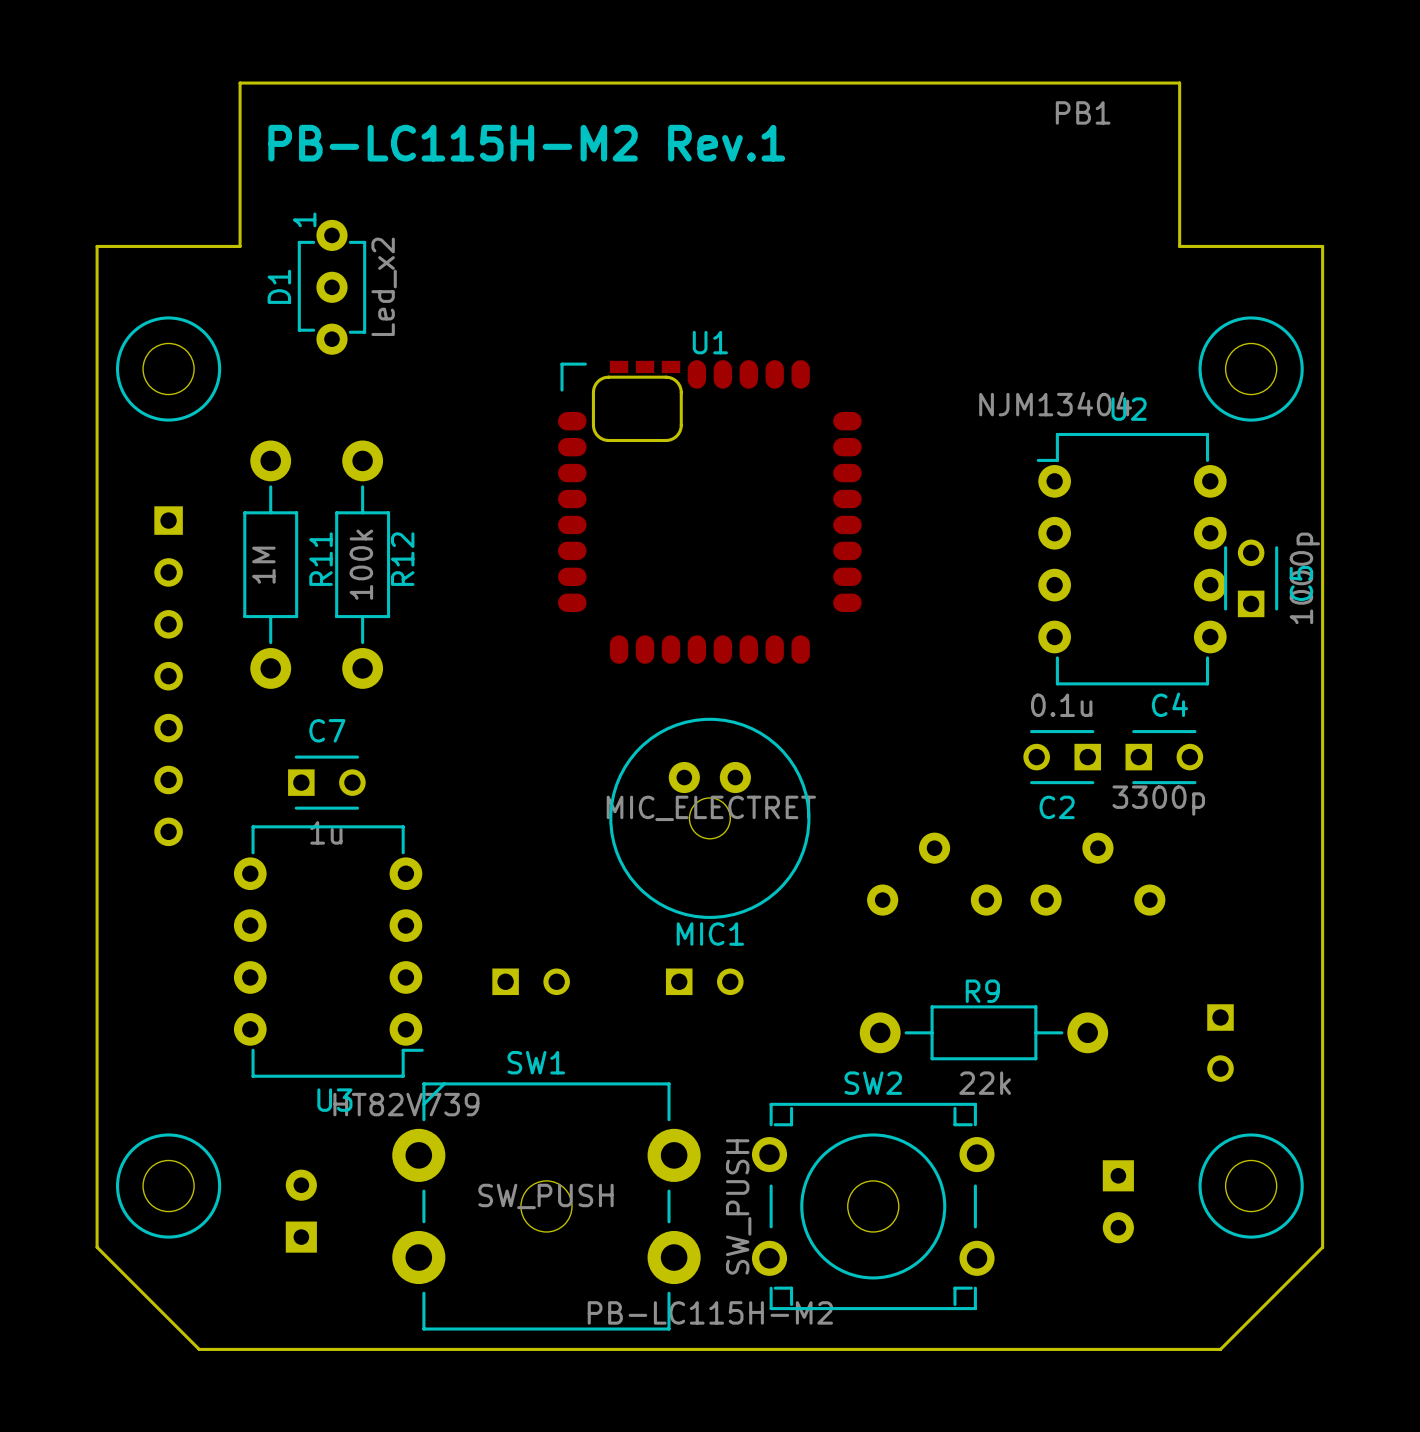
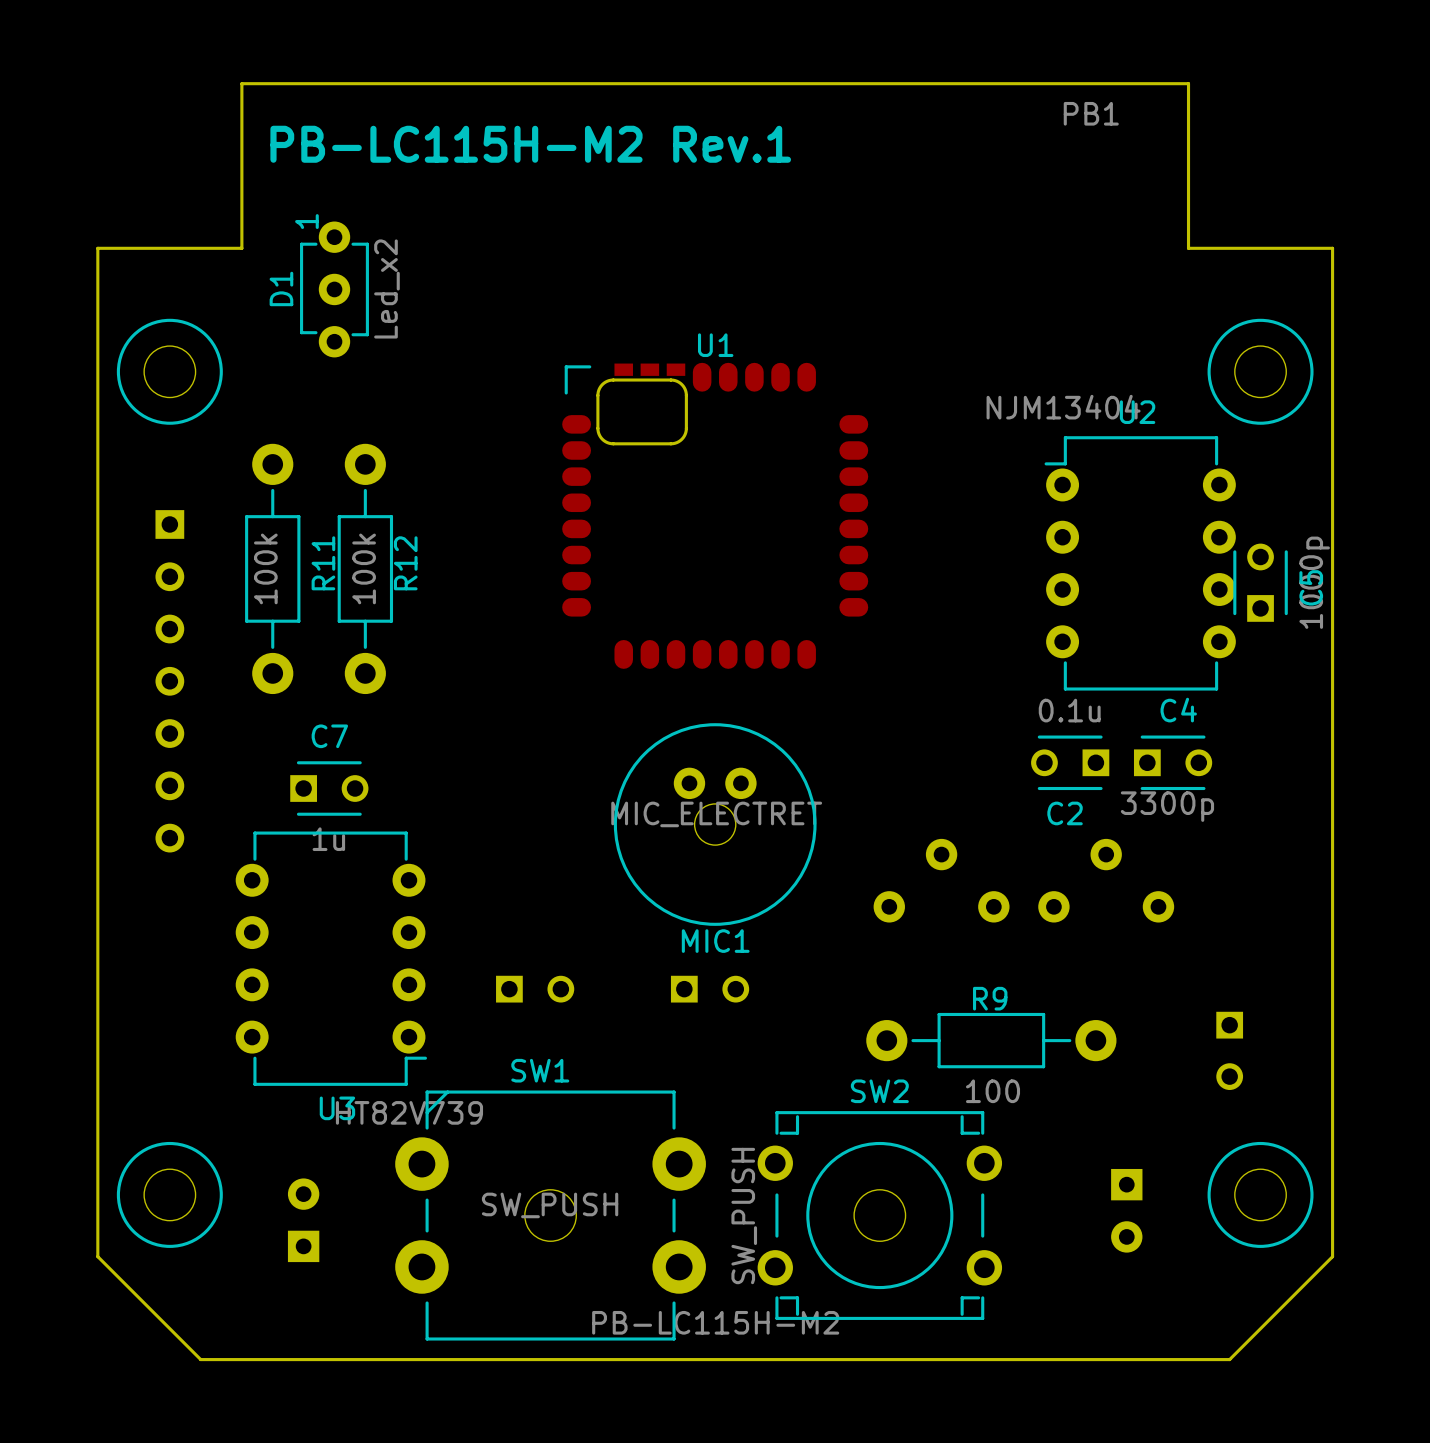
R11 value: 1M (263, 565) -> 100k (265, 568)
R9 value: 22k (985, 1083) -> 100 (993, 1091)

